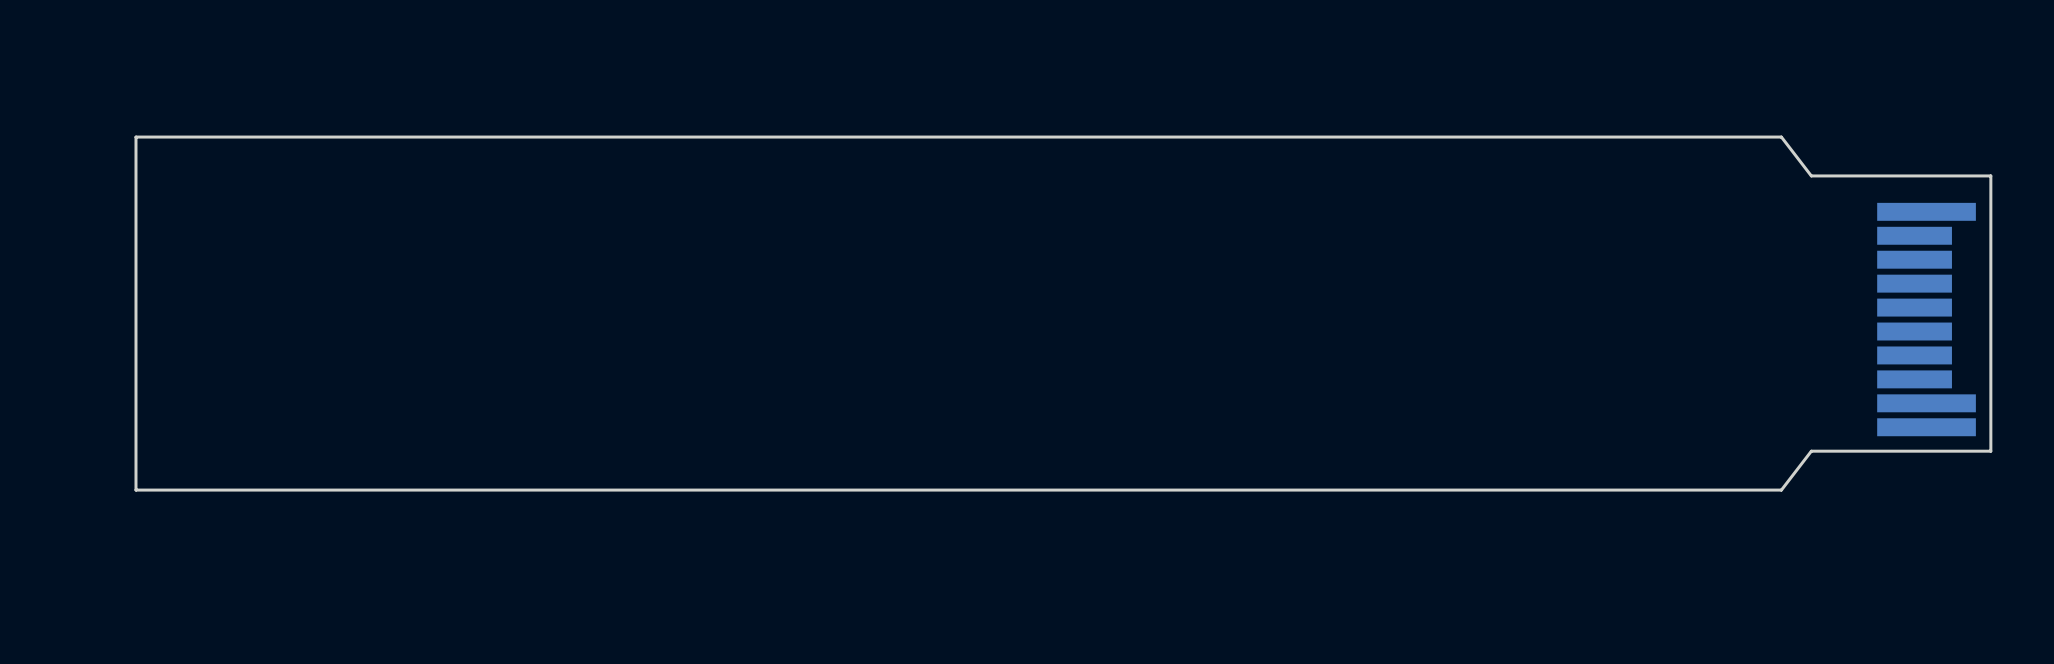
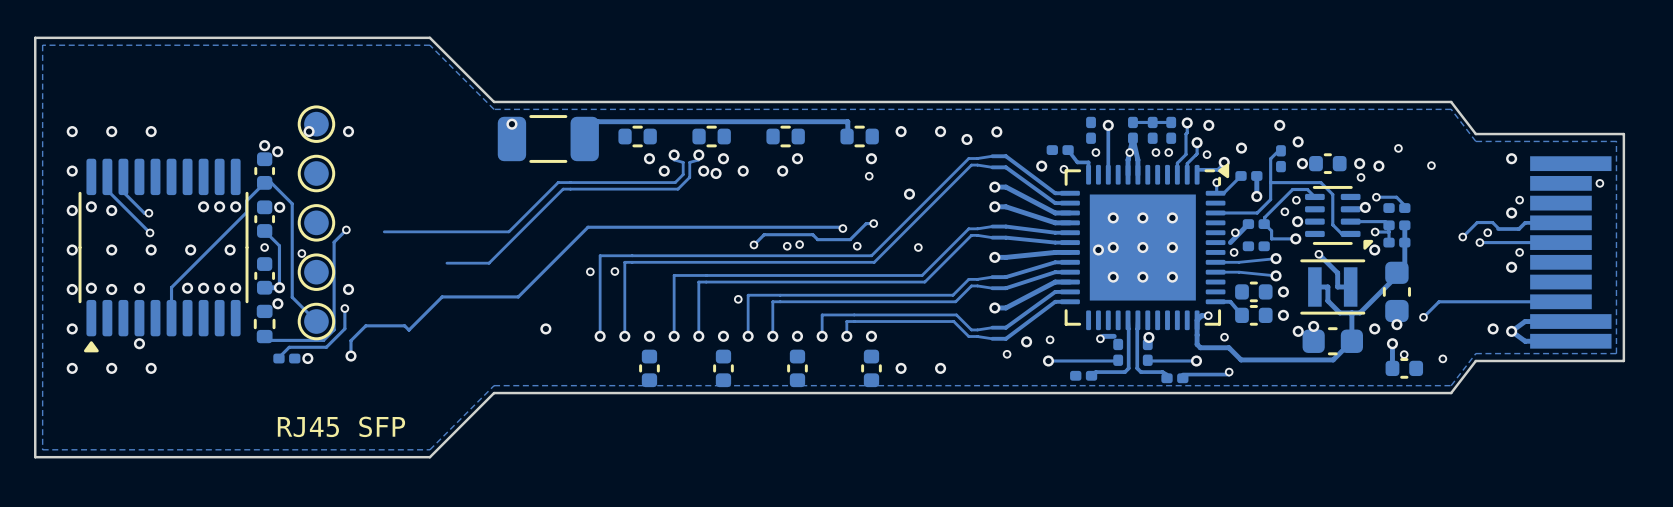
zone outline: none -> (429, 45) (494, 109) (1451, 109) (1475, 141) (1616, 141) (1616, 353) (1475, 353) (1451, 385) (494, 385) (429, 449) (42, 449) (42, 45) (429, 45)
board edge: (620, 137) (135, 137) (135, 490) (620, 490) -> (494, 101) (429, 37) (35, 37) (35, 457) (429, 457) (494, 393)
track: none -> (1171, 122) (1132, 122)
track: none -> (1187, 122) (1186, 154) (1177, 163) (1177, 174)
via: none -> (1187, 122)
part: none -> (316, 124)
via: none -> (511, 124)
track: none -> (1108, 125) (1108, 174)
via: none -> (1108, 125)
via: none -> (1208, 125)
via: none -> (1279, 125)
part: none -> (1091, 130)
part: none -> (1132, 130)
part: none -> (1152, 130)
part: none -> (1171, 130)
via: none -> (72, 131)
via: none -> (111, 131)
via: none -> (151, 131)
via: none -> (309, 131)
via: none -> (348, 131)
via: none -> (901, 131)
via: none -> (940, 131)
via: none -> (996, 131)
part: none -> (637, 136)
part: none -> (711, 136)
part: none -> (785, 136)
track: none -> (847, 136) (847, 121) (597, 121) (584, 134) (584, 138)
part: none -> (859, 136)
part: none -> (548, 138)
via: none -> (966, 139)
via: none -> (1298, 141)
track: none -> (1197, 142) (1197, 153) (1187, 163) (1187, 174)
via: none -> (1197, 142)
via: none -> (264, 145)
via: none -> (1241, 148)
via: none -> (1398, 148)
part: none -> (1060, 150)
track: none -> (1068, 150) (1077, 162) (1088, 162) (1088, 174)
track: none -> (1280, 150) (1270, 158) (1270, 199) (1257, 212) (1215, 212)
via: none -> (277, 151)
via: none -> (1095, 152)
via: none -> (1129, 152)
via: none -> (1155, 152)
via: none -> (1168, 152)
via: none -> (1207, 154)
track: none -> (674, 155) (674, 159) (683, 162) (683, 174) (675, 182) (558, 182) (508, 231) (384, 231)
via: none -> (674, 155)
track: none -> (698, 155) (698, 159) (689, 162) (689, 177) (677, 189) (563, 189) (489, 263) (446, 263)
via: none -> (698, 155)
via: none -> (649, 158)
via: none -> (723, 158)
via: none -> (797, 158)
via: none -> (871, 158)
part: none -> (1280, 158)
via: none -> (1511, 158)
track: none -> (1224, 162) (1218, 169) (1197, 169) (1197, 174)
via: none -> (1224, 162)
via: none -> (1302, 163)
part: none -> (1327, 163)
via: none -> (1359, 163)
via: none -> (1041, 166)
via: none -> (1378, 166)
via: none -> (1431, 165)
via: none -> (1064, 169)
via: none -> (72, 171)
part: none -> (264, 171)
via: none -> (664, 171)
via: none -> (703, 171)
via: none -> (743, 171)
via: none -> (782, 171)
part: none -> (316, 173)
via: none -> (716, 173)
track: none -> (1137, 174) (1137, 159) (1132, 138) (1128, 159) (1128, 174)
track: none -> (1241, 175) (1223, 193) (1215, 193) (1216, 182)
part: none -> (1248, 175)
track: none -> (1256, 175) (1256, 196)
track: none -> (107, 176) (107, 190) (150, 232)
track: none -> (123, 176) (123, 192) (144, 213) (148, 213)
via: none -> (869, 176)
via: none -> (1361, 177)
via: none -> (1216, 182)
track: none -> (1270, 182) (1320, 182) (1332, 194) (1332, 224) (1341, 233) (1350, 233)
via: none -> (1599, 183)
track: none -> (994, 187) (1005, 187) (1055, 212) (1070, 212)
via: none -> (994, 187)
track: none -> (1070, 193) (1055, 193) (1005, 156) (968, 158) (871, 255) (600, 255) (600, 336)
via: none -> (909, 194)
via: none -> (1256, 196)
track: none -> (1314, 196) (1307, 189) (1292, 189) (1264, 217) (1264, 224)
track: none -> (1376, 197) (1396, 197) (1404, 205) (1404, 208)
via: none -> (1376, 197)
via: none -> (1296, 200)
via: none -> (1519, 200)
track: none -> (1070, 203) (1055, 203) (1005, 167) (971, 165) (874, 262) (624, 262) (624, 336)
via: none -> (91, 206)
via: none -> (203, 206)
via: none -> (219, 206)
via: none -> (235, 206)
via: none -> (279, 207)
track: none -> (994, 206) (1005, 206) (1055, 222) (1070, 222)
via: none -> (994, 206)
via: none -> (1365, 207)
part: none -> (1396, 208)
via: none -> (72, 210)
via: none -> (111, 210)
via: none -> (1284, 211)
via: none -> (148, 213)
via: none -> (1511, 212)
via: none -> (1113, 217)
via: none -> (1142, 217)
via: none -> (1172, 217)
part: none -> (1339, 217)
part: none -> (264, 219)
via: none -> (1297, 221)
track: none -> (1350, 221) (1385, 221) (1389, 225) (1389, 242)
part: none -> (316, 222)
track: none -> (1560, 222) (1525, 222) (1519, 229) (1498, 229)
track: none -> (873, 223) (866, 223) (850, 239) (817, 239) (812, 234) (764, 234) (753, 244)
via: none -> (873, 223)
track: none -> (1248, 224) (1230, 242)
part: none -> (1256, 224)
track: none -> (1264, 224) (1271, 230) (1271, 238) (1295, 238)
part: none -> (1396, 225)
track: none -> (1404, 225) (1404, 264) (1396, 272) (1396, 276) (1360, 312) (1339, 312) (1327, 300) (1327, 286) (1314, 286)
track: none -> (842, 228) (588, 227) (518, 296) (442, 296) (408, 330) (404, 325) (365, 325) (350, 340) (350, 356)
via: none -> (842, 228)
track: none -> (1499, 229) (1492, 222) (1477, 222) (1462, 237)
track: none -> (346, 229) (334, 242) (334, 329) (323, 340) (268, 340) (264, 336)
via: none -> (346, 229)
track: none -> (264, 230) (279, 245) (279, 287) (264, 287)
via: none -> (1375, 232)
track: none -> (1389, 232) (1375, 232)
via: none -> (150, 232)
track: none -> (1070, 232) (1005, 226) (968, 228) (922, 275) (674, 275) (674, 336)
via: none -> (1235, 232)
via: none -> (1487, 232)
via: none -> (1462, 237)
via: none -> (1295, 238)
track: none -> (1070, 242) (971, 235) (924, 282) (698, 282) (698, 336)
part: none -> (1396, 242)
via: none -> (1479, 242)
track: none -> (1560, 242) (1479, 242)
via: none -> (753, 244)
via: none -> (799, 244)
via: none -> (857, 246)
via: none -> (787, 246)
part: none -> (1144, 246)
part: none -> (1256, 246)
via: none -> (264, 247)
via: none -> (918, 247)
via: none -> (1113, 247)
via: none -> (1142, 247)
via: none -> (1172, 247)
via: none -> (72, 249)
via: none -> (111, 249)
via: none -> (151, 249)
via: none -> (190, 249)
via: none -> (230, 249)
via: none -> (1098, 249)
via: none -> (1374, 249)
track: none -> (1070, 252) (994, 257)
via: none -> (1234, 252)
via: none -> (1519, 252)
via: none -> (301, 253)
track: none -> (1318, 254) (1337, 273) (1337, 286) (1350, 286)
via: none -> (1318, 254)
part: none -> (163, 255)
via: none -> (994, 257)
track: none -> (1276, 258) (1215, 262)
via: none -> (1276, 258)
track: none -> (1070, 262) (1055, 262) (1005, 277) (968, 279) (952, 295) (748, 295) (748, 336)
via: none -> (1511, 267)
via: none -> (614, 271)
part: none -> (316, 272)
via: none -> (590, 271)
track: none -> (1070, 272) (1055, 272) (1005, 288) (971, 285) (955, 301) (772, 301) (772, 336)
track: none -> (1215, 272) (1276, 275)
part: none -> (264, 275)
via: none -> (1276, 275)
via: none -> (1113, 277)
via: none -> (1142, 277)
via: none -> (1172, 277)
track: none -> (1070, 282) (1055, 282) (1005, 307) (994, 307)
part: none -> (1332, 286)
via: none -> (91, 288)
via: none -> (139, 288)
via: none -> (187, 288)
via: none -> (203, 288)
via: none -> (219, 288)
via: none -> (235, 288)
via: none -> (279, 287)
via: none -> (72, 289)
via: none -> (111, 289)
via: none -> (348, 289)
track: none -> (1070, 291) (1055, 291) (1005, 327) (971, 329) (956, 314) (822, 314) (822, 336)
part: none -> (1253, 291)
via: none -> (1283, 291)
part: none -> (1396, 291)
via: none -> (738, 299)
track: none -> (1070, 301) (1055, 301) (1005, 338) (968, 336) (953, 321) (846, 321) (846, 336)
track: none -> (1215, 301) (1230, 301) (1242, 315)
track: none -> (1560, 301) (1439, 301) (1423, 317)
via: none -> (277, 303)
via: none -> (994, 307)
track: none -> (344, 308) (344, 328) (326, 347) (289, 347) (278, 358)
via: none -> (344, 308)
track: none -> (1351, 312) (1351, 341) (1333, 359) (1241, 359) (1228, 347) (1200, 347) (1197, 344) (1197, 320) (1201, 315) (1208, 315)
part: none -> (1253, 315)
via: none -> (1283, 315)
via: none -> (1208, 315)
via: none -> (1423, 317)
track: none -> (171, 318) (171, 287) (246, 212) (246, 201) (264, 182) (271, 182) (292, 203) (292, 297) (316, 321)
track: none -> (1128, 320) (1128, 368) (1124, 372) (1091, 373)
track: none -> (1137, 320) (1137, 368) (1140, 372) (1162, 372) (1167, 374)
part: none -> (316, 321)
track: none -> (1570, 321) (1525, 321) (1511, 331) (1525, 341) (1537, 341)
part: none -> (264, 323)
via: none -> (1396, 324)
via: none -> (1313, 326)
via: none -> (72, 328)
via: none -> (545, 328)
via: none -> (1374, 328)
via: none -> (1493, 328)
via: none -> (1298, 331)
via: none -> (1511, 331)
via: none -> (600, 336)
via: none -> (624, 336)
via: none -> (649, 336)
via: none -> (674, 336)
via: none -> (698, 336)
via: none -> (723, 336)
via: none -> (748, 336)
via: none -> (772, 336)
via: none -> (797, 336)
via: none -> (822, 336)
via: none -> (846, 336)
via: none -> (871, 336)
track: none -> (1114, 336) (1102, 336)
via: none -> (1148, 337)
via: none -> (1224, 337)
via: none -> (1100, 338)
via: none -> (1050, 339)
part: none -> (1332, 341)
via: none -> (1026, 341)
via: none -> (139, 343)
track: none -> (1392, 343) (1392, 368)
via: none -> (1392, 343)
part: none -> (1118, 352)
part: none -> (1147, 352)
via: none -> (1007, 354)
via: none -> (1404, 354)
via: none -> (350, 356)
part: none -> (286, 358)
via: none -> (307, 358)
via: none -> (1442, 358)
track: none -> (1118, 360) (1048, 360)
track: none -> (1147, 360) (1196, 360)
via: none -> (1048, 360)
via: none -> (1196, 360)
via: none -> (72, 368)
via: none -> (111, 368)
via: none -> (151, 368)
part: none -> (649, 368)
part: none -> (723, 368)
part: none -> (797, 368)
part: none -> (871, 368)
via: none -> (901, 368)
via: none -> (940, 368)
part: none -> (1404, 368)
track: none -> (1229, 372) (1229, 374) (1182, 374)
via: none -> (1229, 372)
part: none -> (1083, 375)
part: none -> (1174, 378)
text: none -> RJ45 SFP (341, 426)

